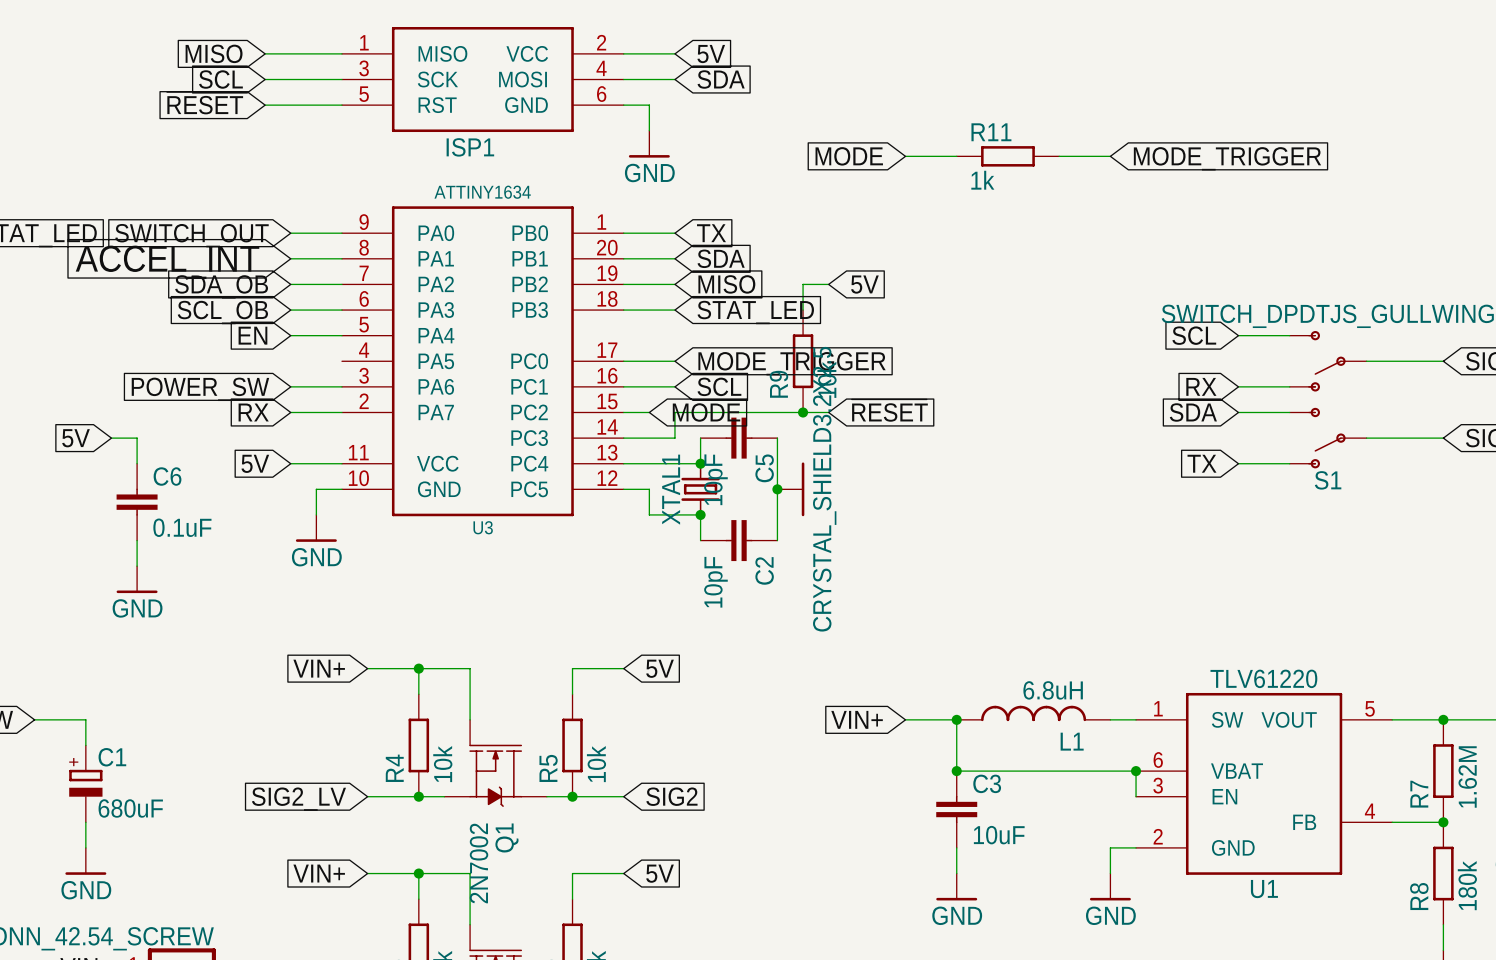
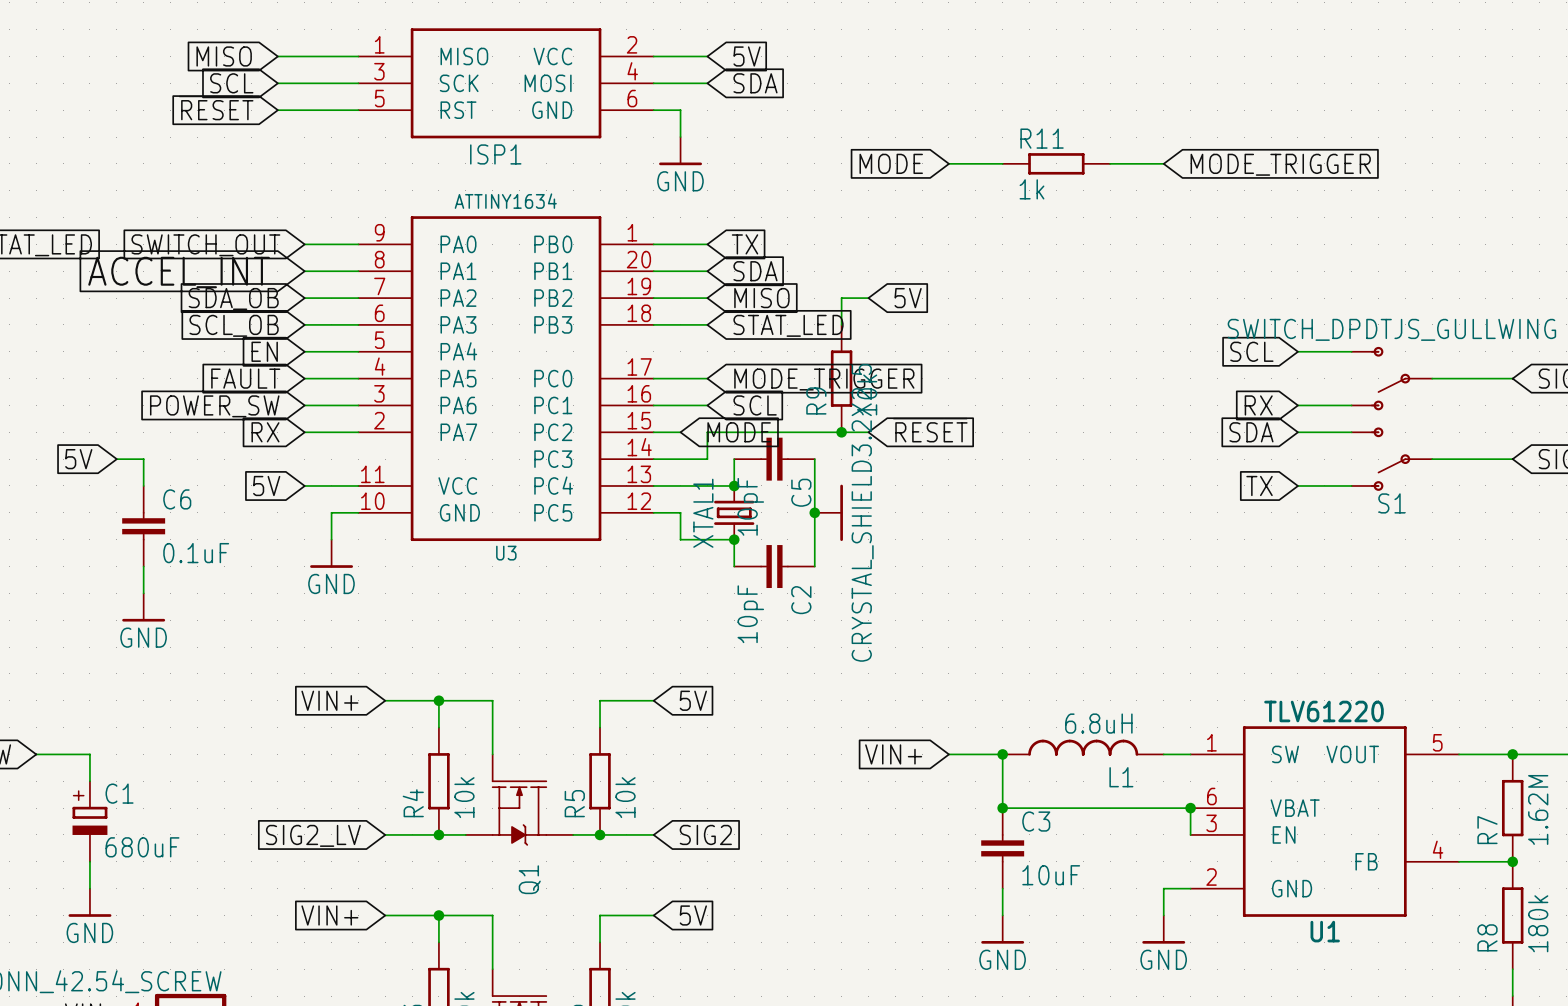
global label: none -> FAULT (245, 378)
wire: none -> (304, 378) (358, 378)
Q1 value: 2N7002 (479, 863) -> none

